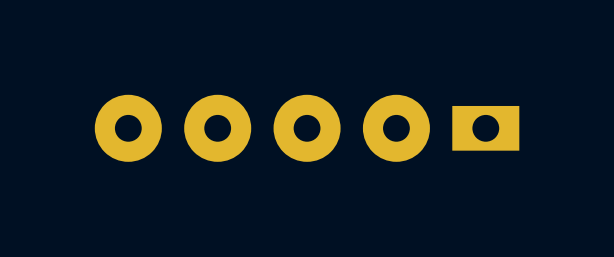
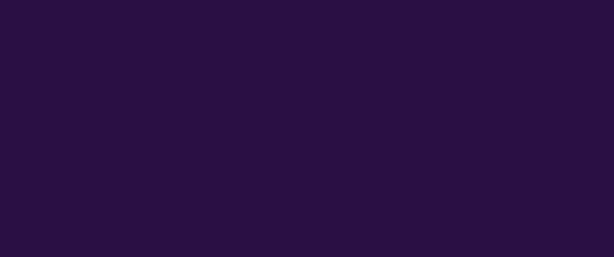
part: (307, 128) -> none

